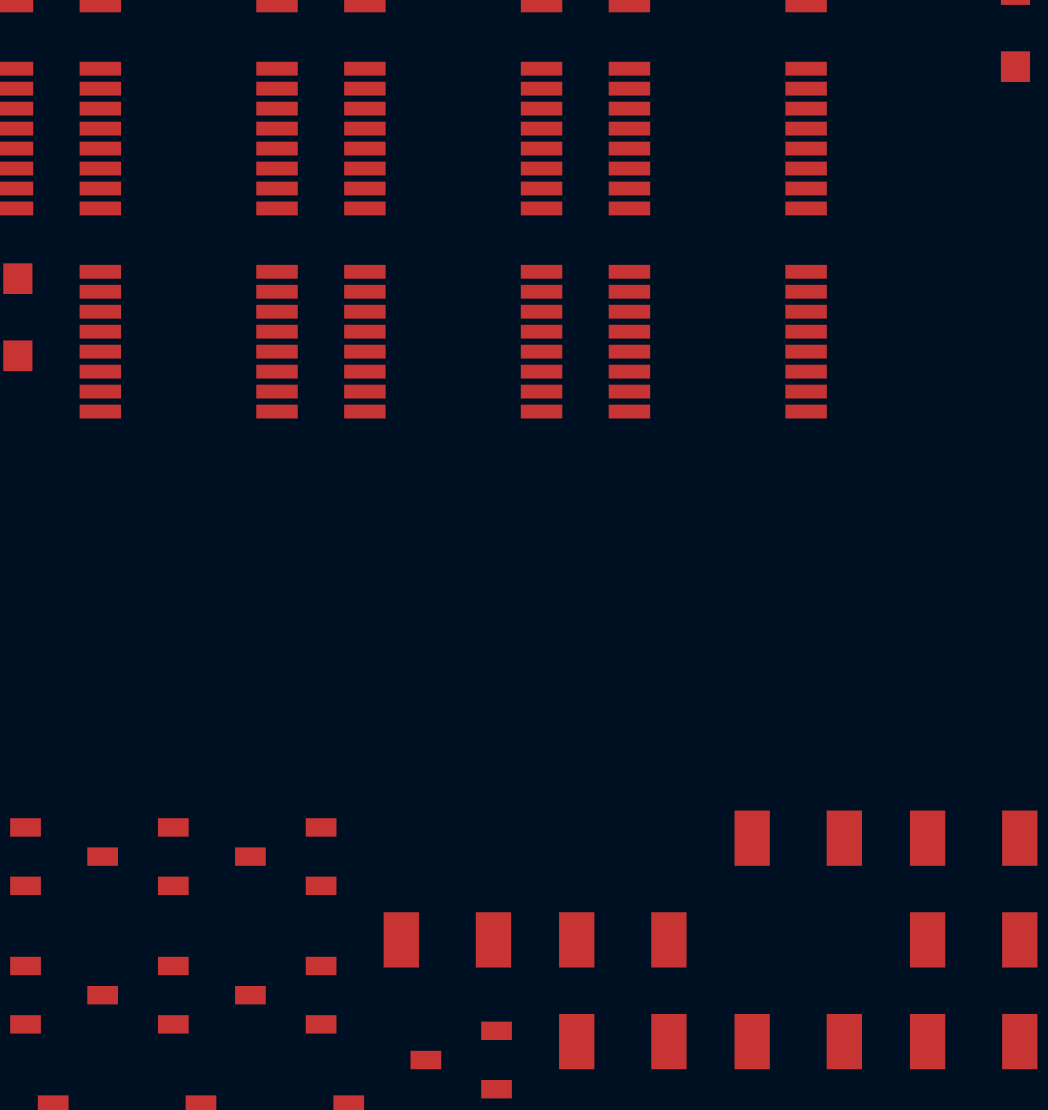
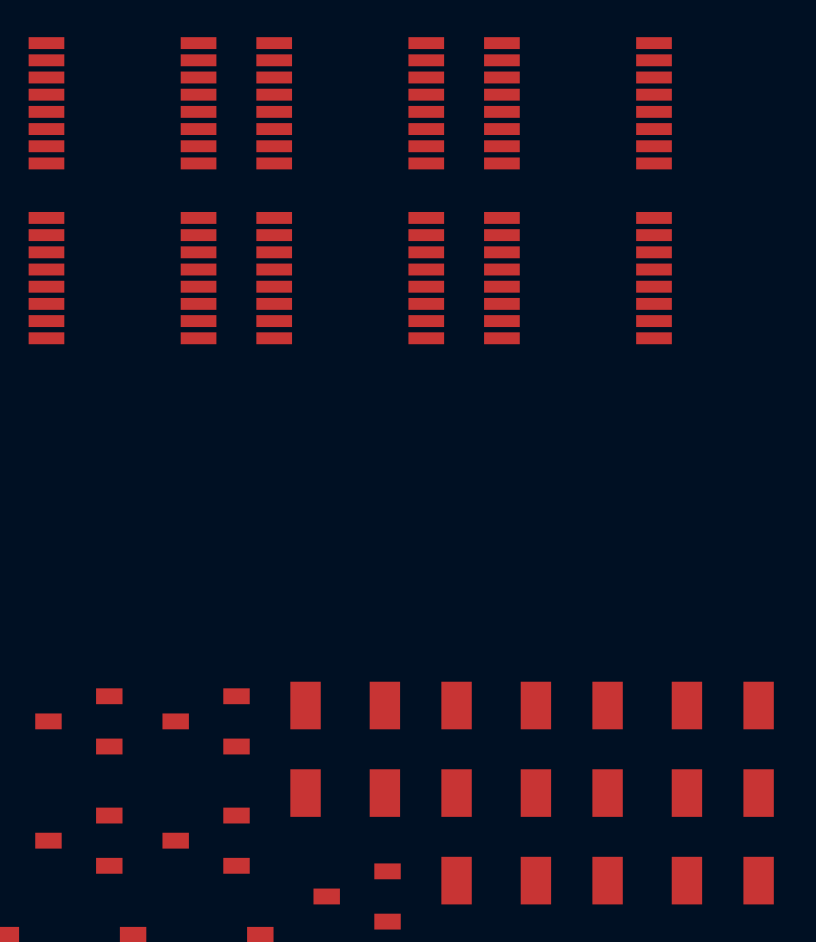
part: none -> (345, 705)
part: none -> (496, 705)
part: none -> (647, 793)

